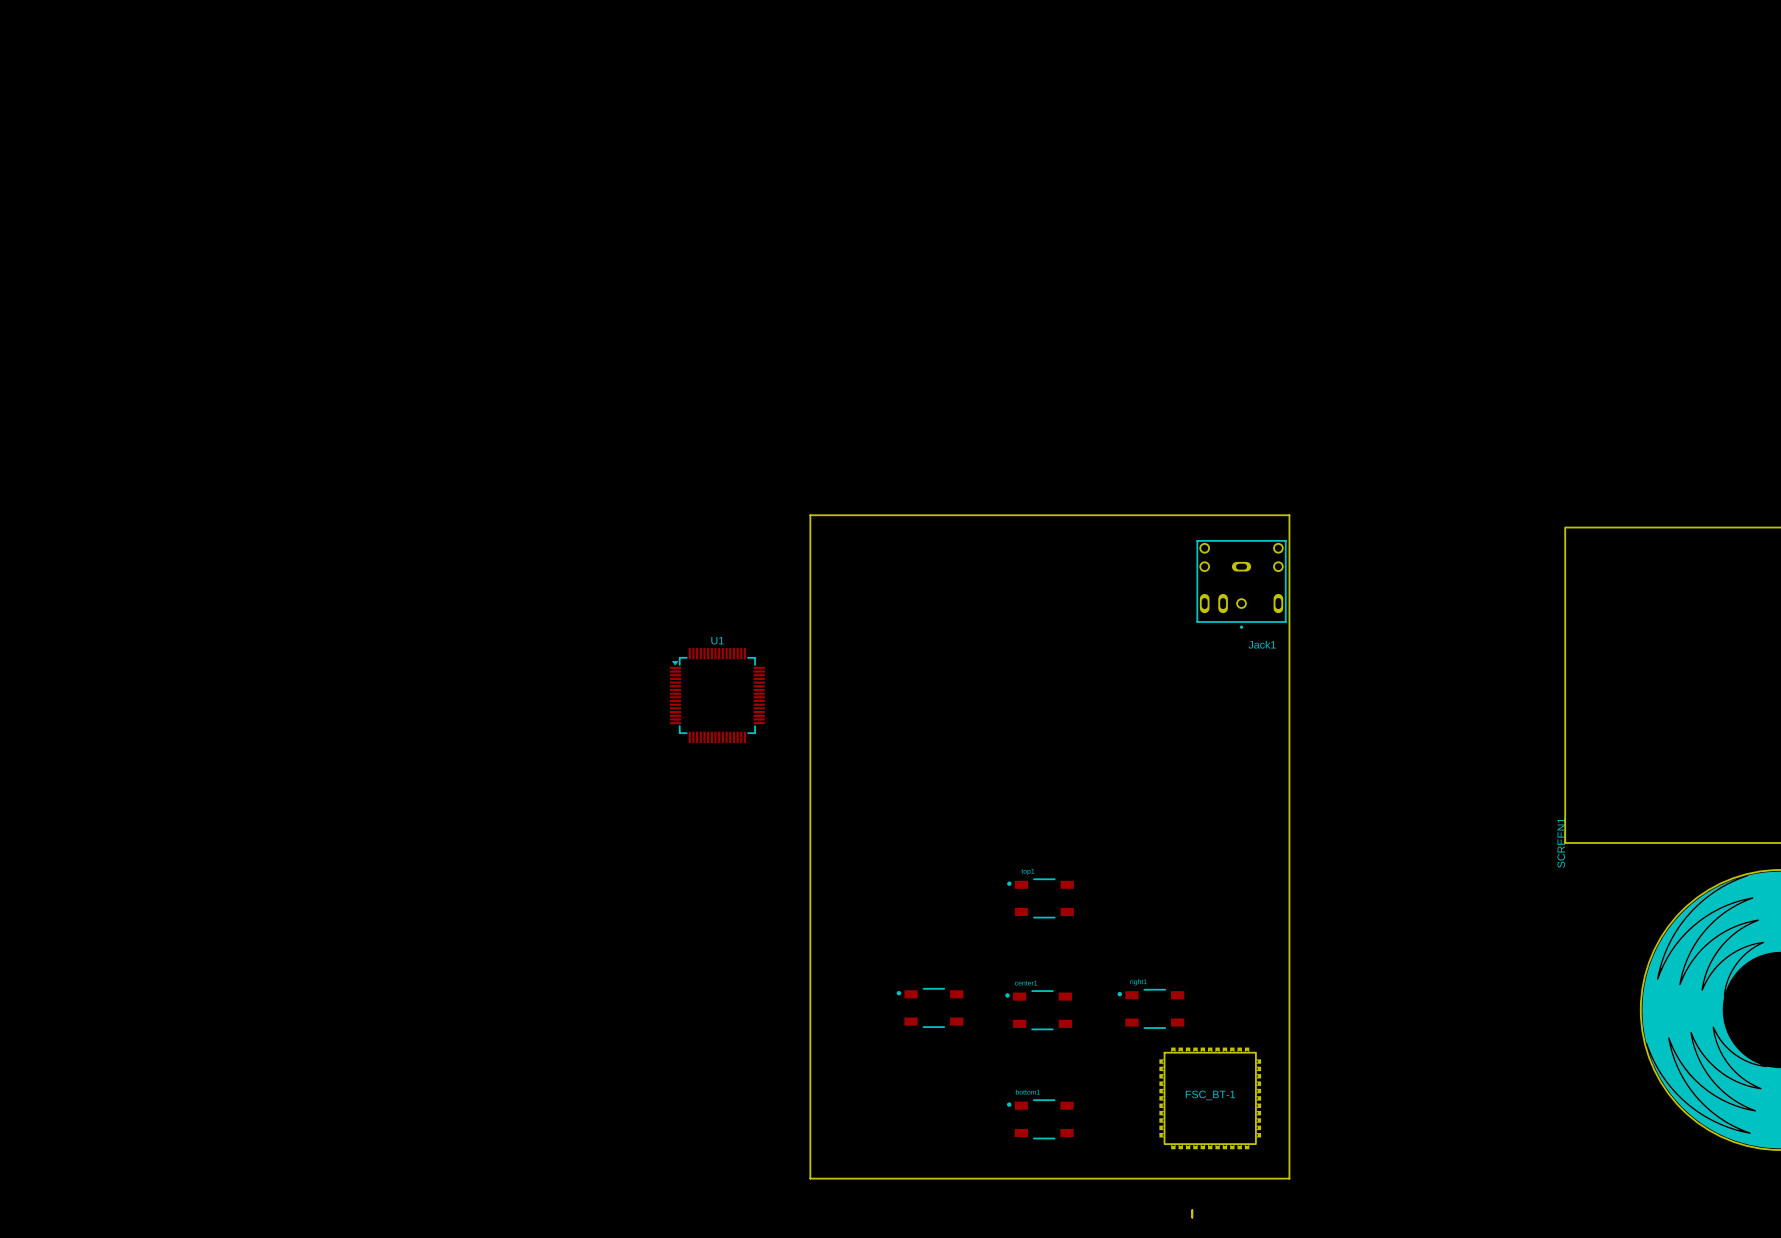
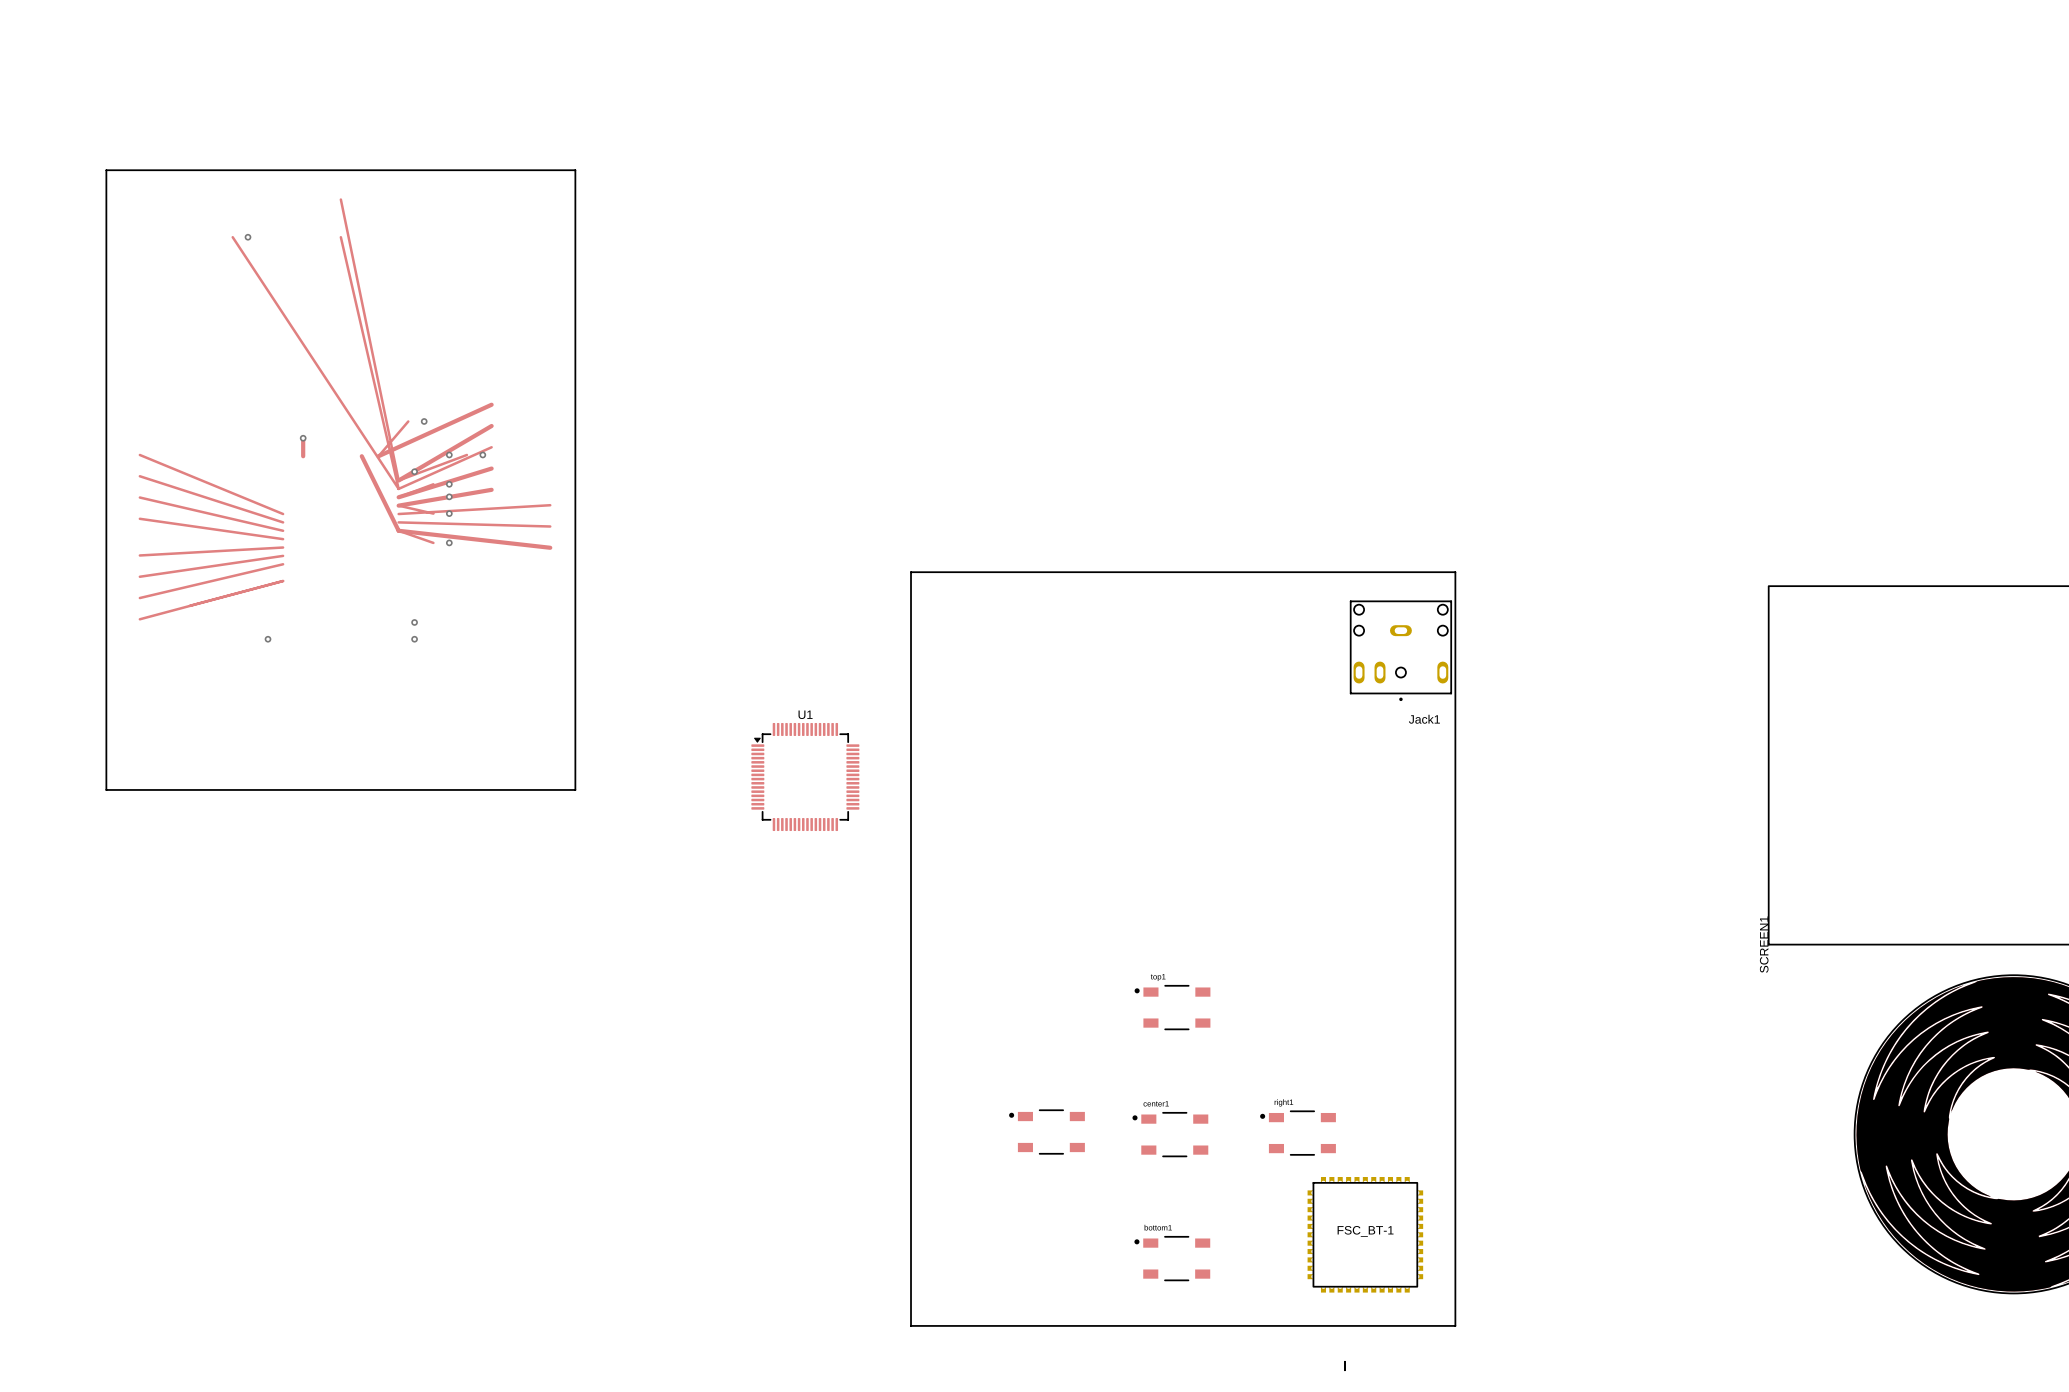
board edge: none -> (106, 170) (575, 170) (575, 789) (106, 789) (106, 170)
track: none -> (340, 199) (398, 480)
track: none -> (232, 237) (398, 488)
via: none -> (247, 237)
track: none -> (340, 237) (398, 488)
track: none -> (491, 404) (378, 456) (408, 421)
via: none -> (424, 421)
track: none -> (491, 426) (398, 480)
track: none -> (303, 438) (303, 456)
via: none -> (303, 438)
track: none -> (491, 447) (398, 488)
track: none -> (139, 454) (283, 514)
via: none -> (449, 454)
track: none -> (466, 454) (398, 480)
via: none -> (482, 454)
track: none -> (361, 456) (398, 530)
track: none -> (491, 468) (398, 497) (433, 484)
via: none -> (414, 471)
track: none -> (139, 476) (283, 522)
via: none -> (449, 484)
track: none -> (491, 489) (398, 505) (433, 513)
via: none -> (449, 496)
track: none -> (139, 497) (283, 530)
track: none -> (550, 505) (398, 514)
via: none -> (449, 513)
track: none -> (139, 518) (283, 539)
track: none -> (398, 522) (550, 526)
track: none -> (398, 530) (433, 542)
track: none -> (398, 530) (550, 547)
via: none -> (449, 542)
track: none -> (283, 547) (139, 555)
track: none -> (283, 555) (139, 576)
track: none -> (283, 564) (139, 598)
track: none -> (190, 605) (283, 581) (139, 619)
via: none -> (414, 622)
via: none -> (268, 639)
via: none -> (414, 639)

